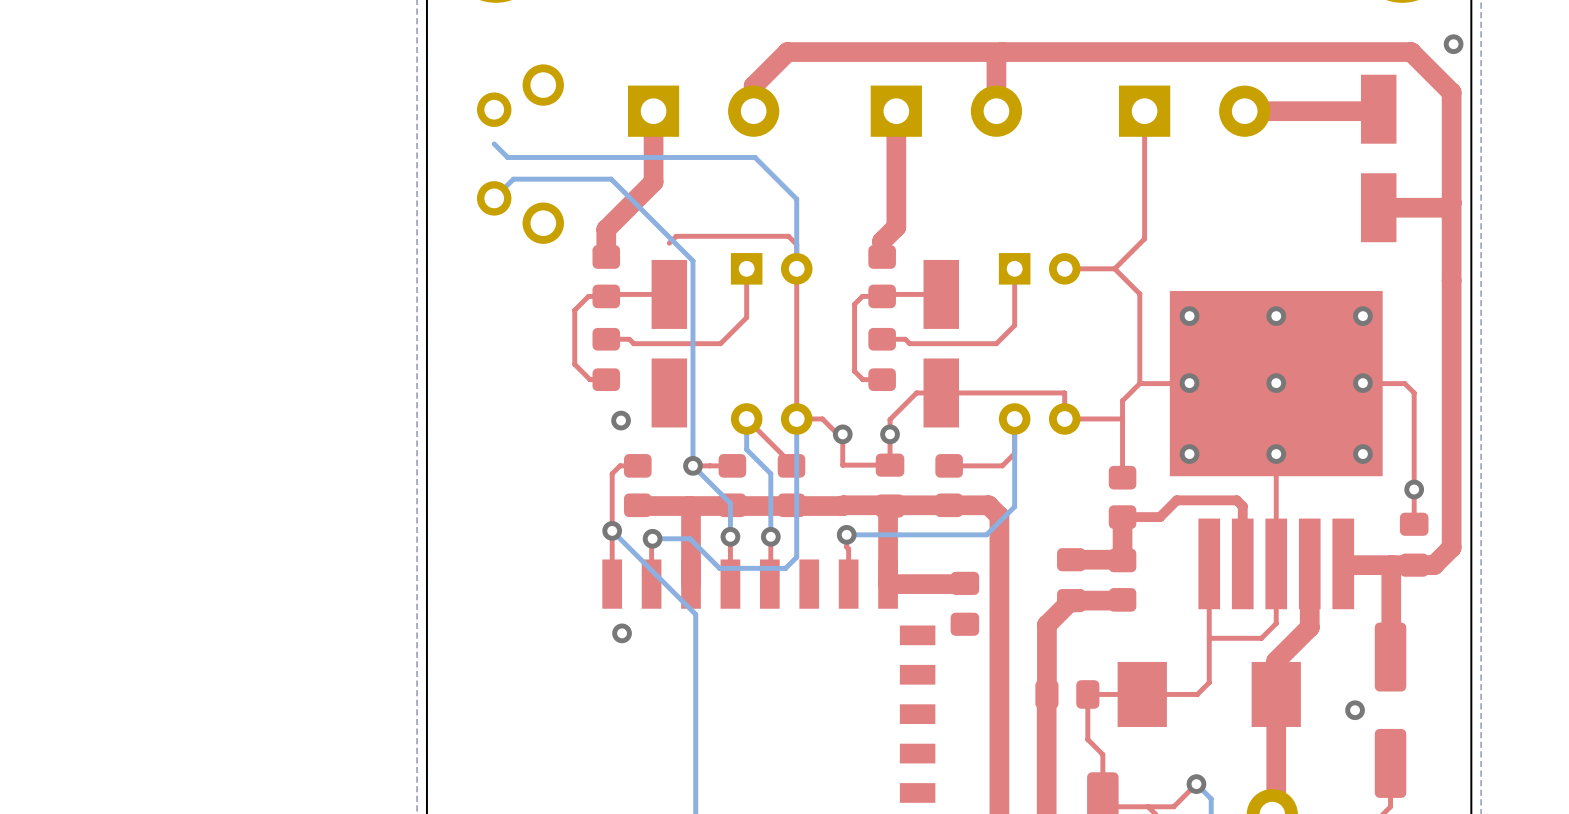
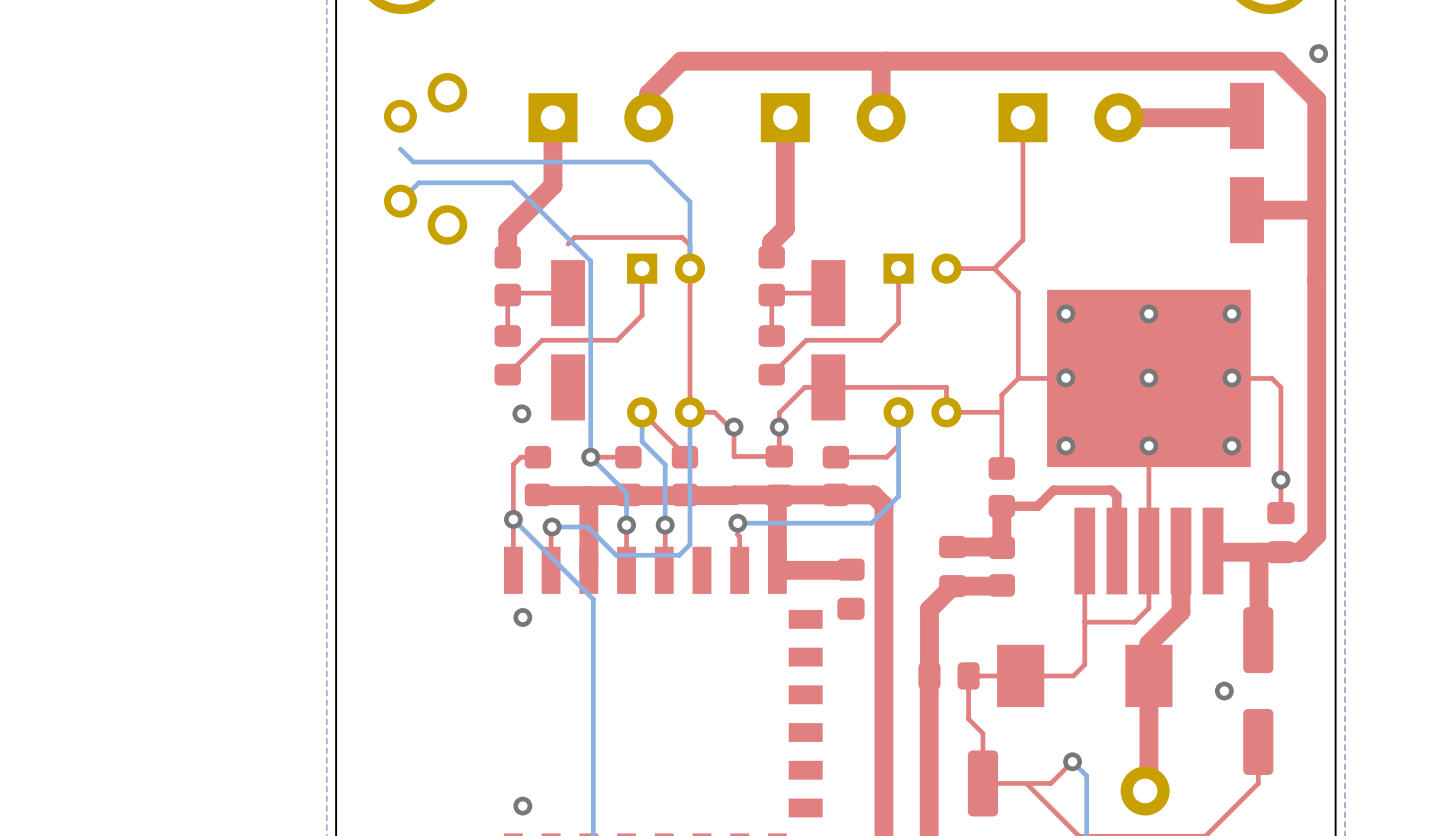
top track: (606, 296) (588, 296) (574, 310) (574, 364) (590, 379) (606, 379) -> (507, 295) (507, 336)
top track: (882, 296) (862, 296) (854, 304) (854, 371) (862, 379) (882, 379) -> (771, 295) (771, 336)
top track: (606, 339) (629, 339) (633, 343) (642, 343) -> (507, 374) (542, 340)
top track: (882, 339) (905, 339) (909, 343) (918, 343) -> (771, 374) (806, 340)

